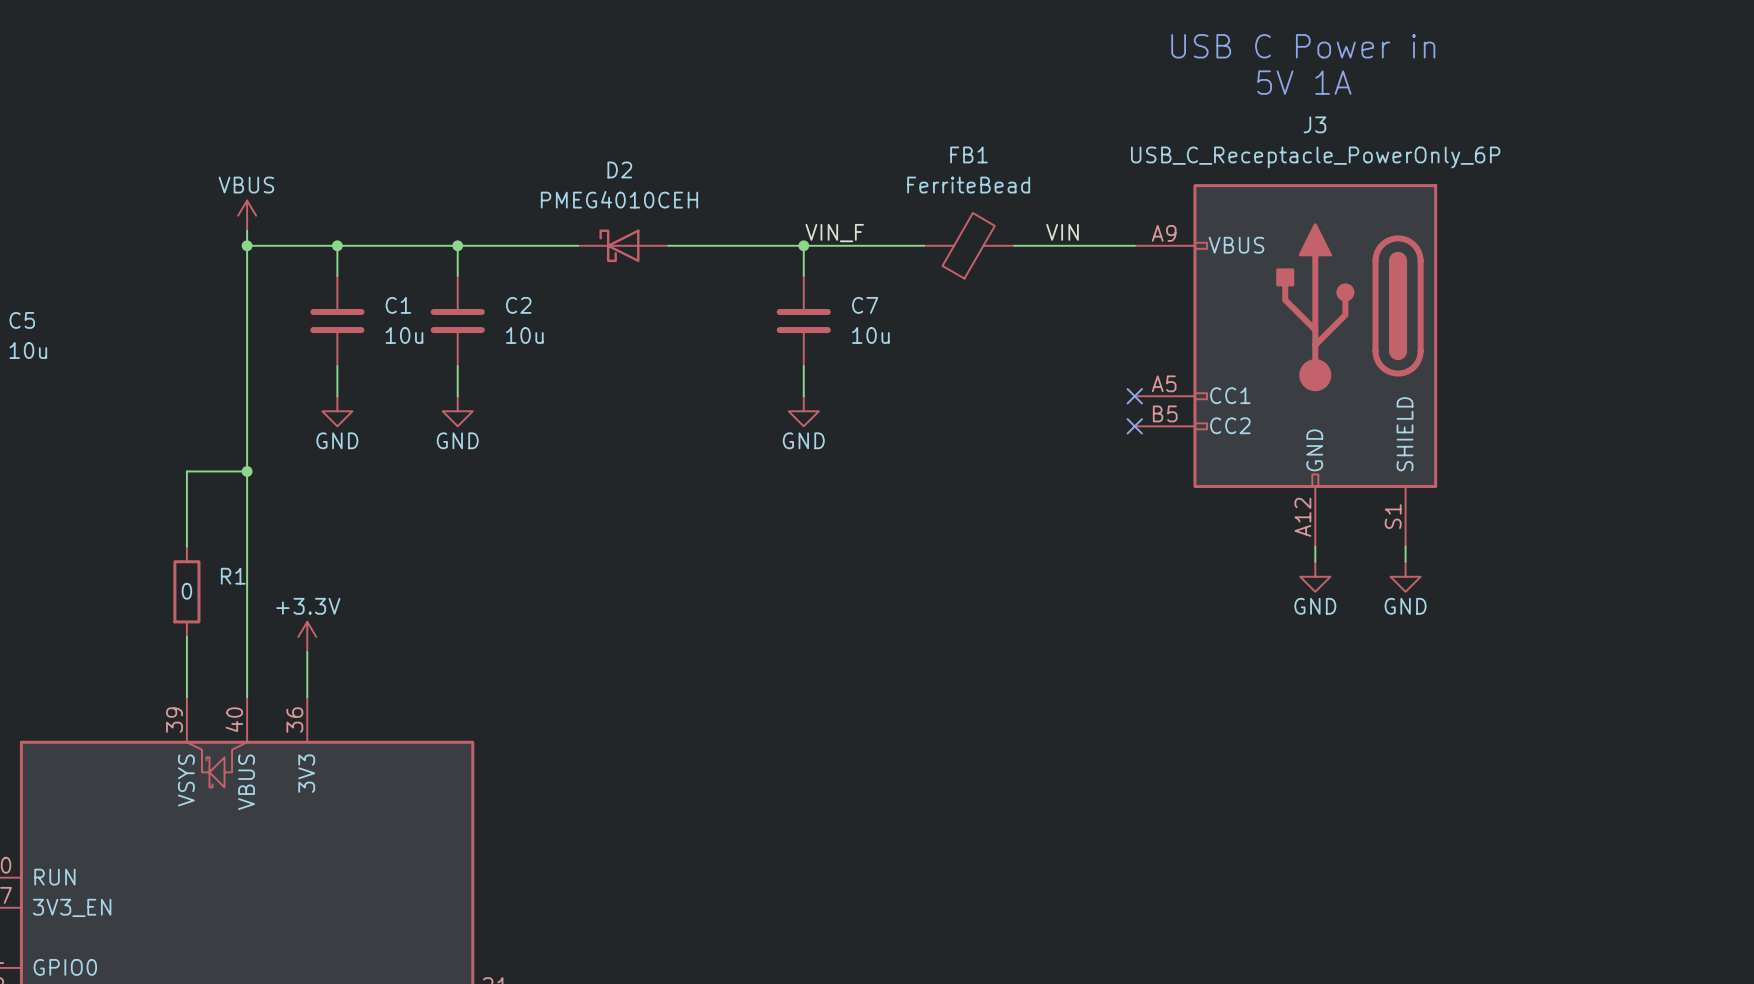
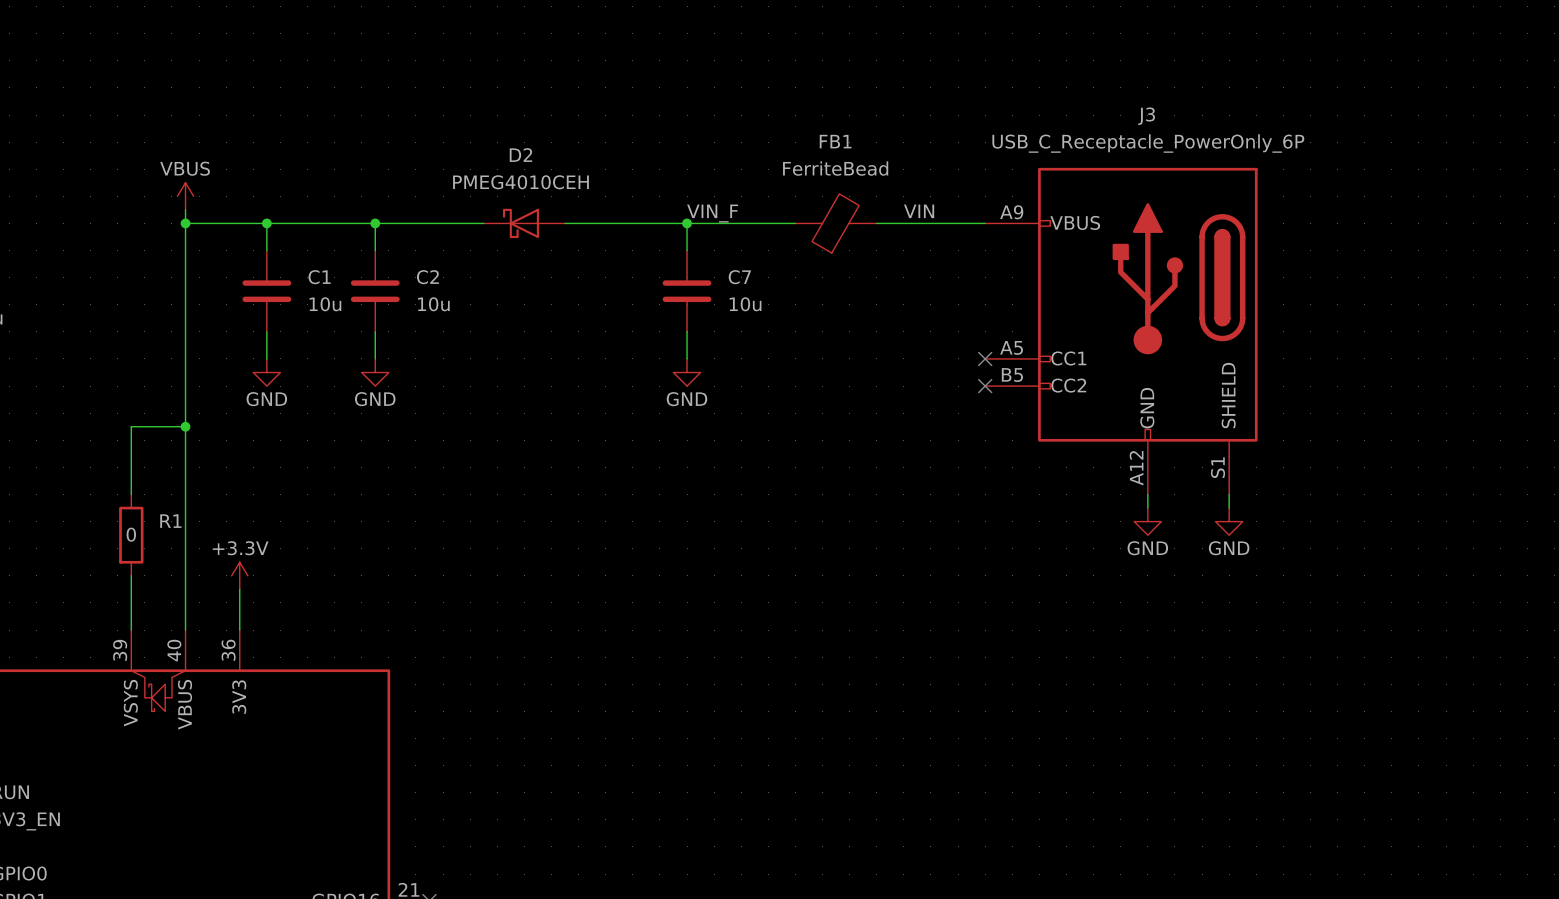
text: USB C Power in (1303, 46) -> none
text: 5V 1A (1304, 82) -> none

